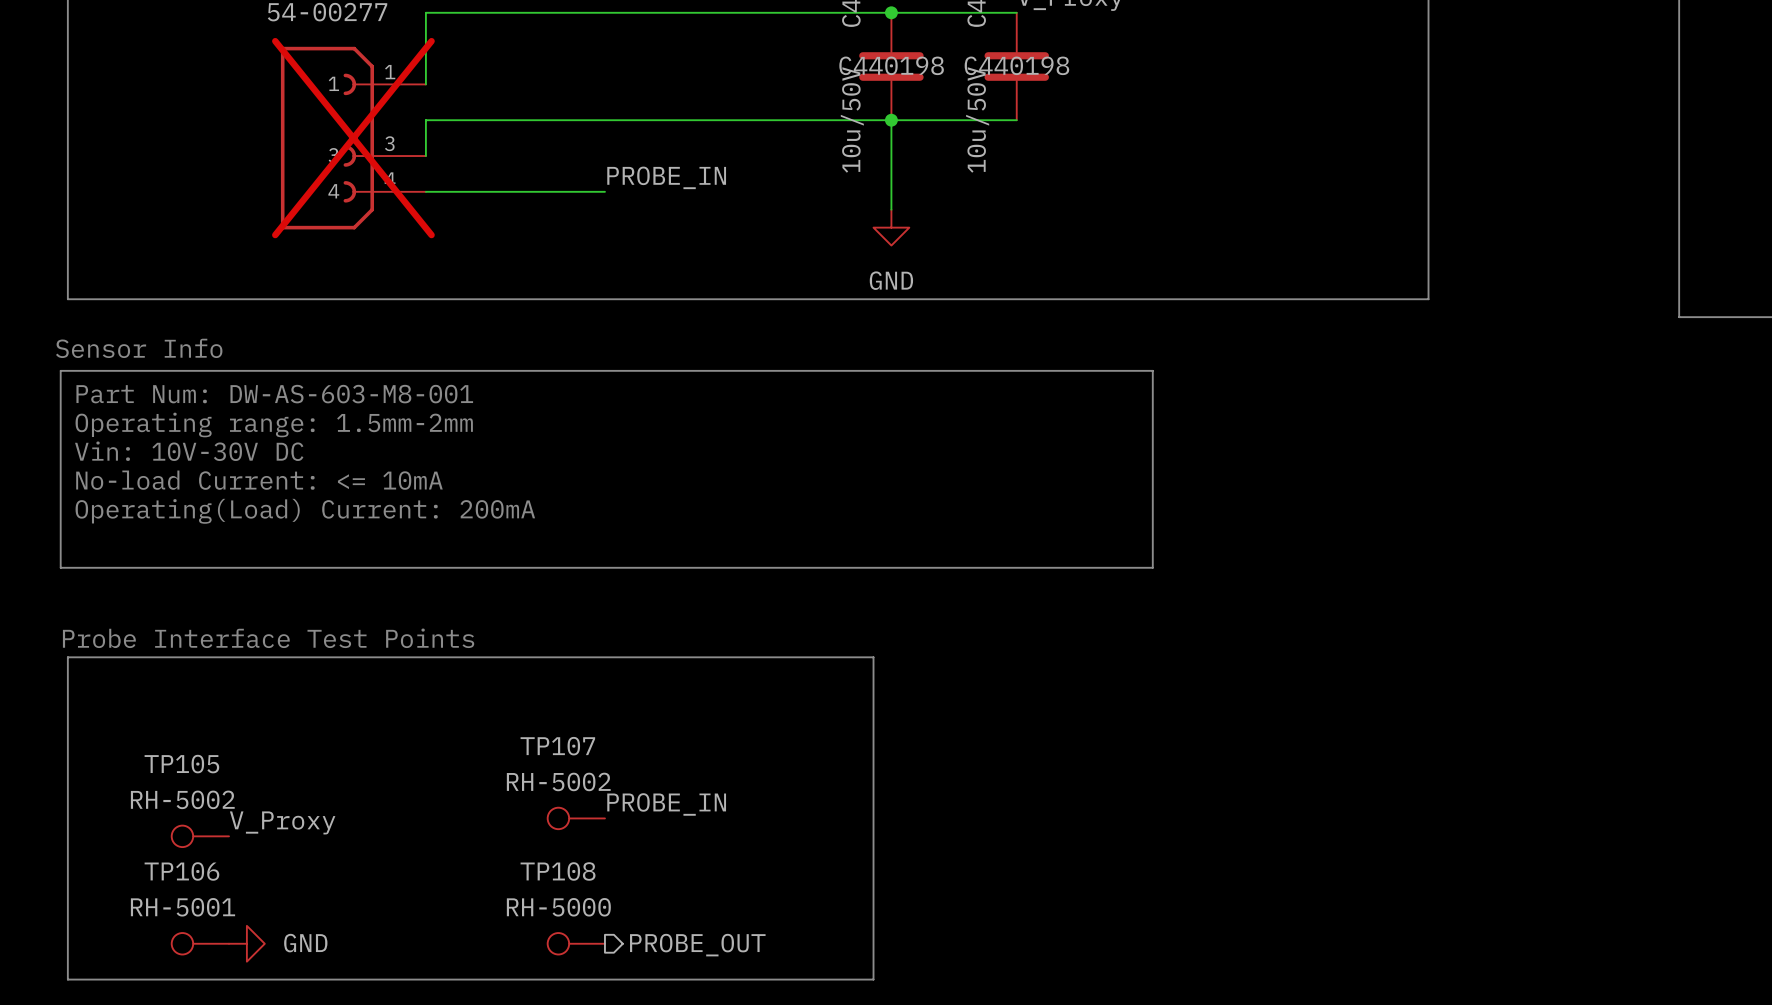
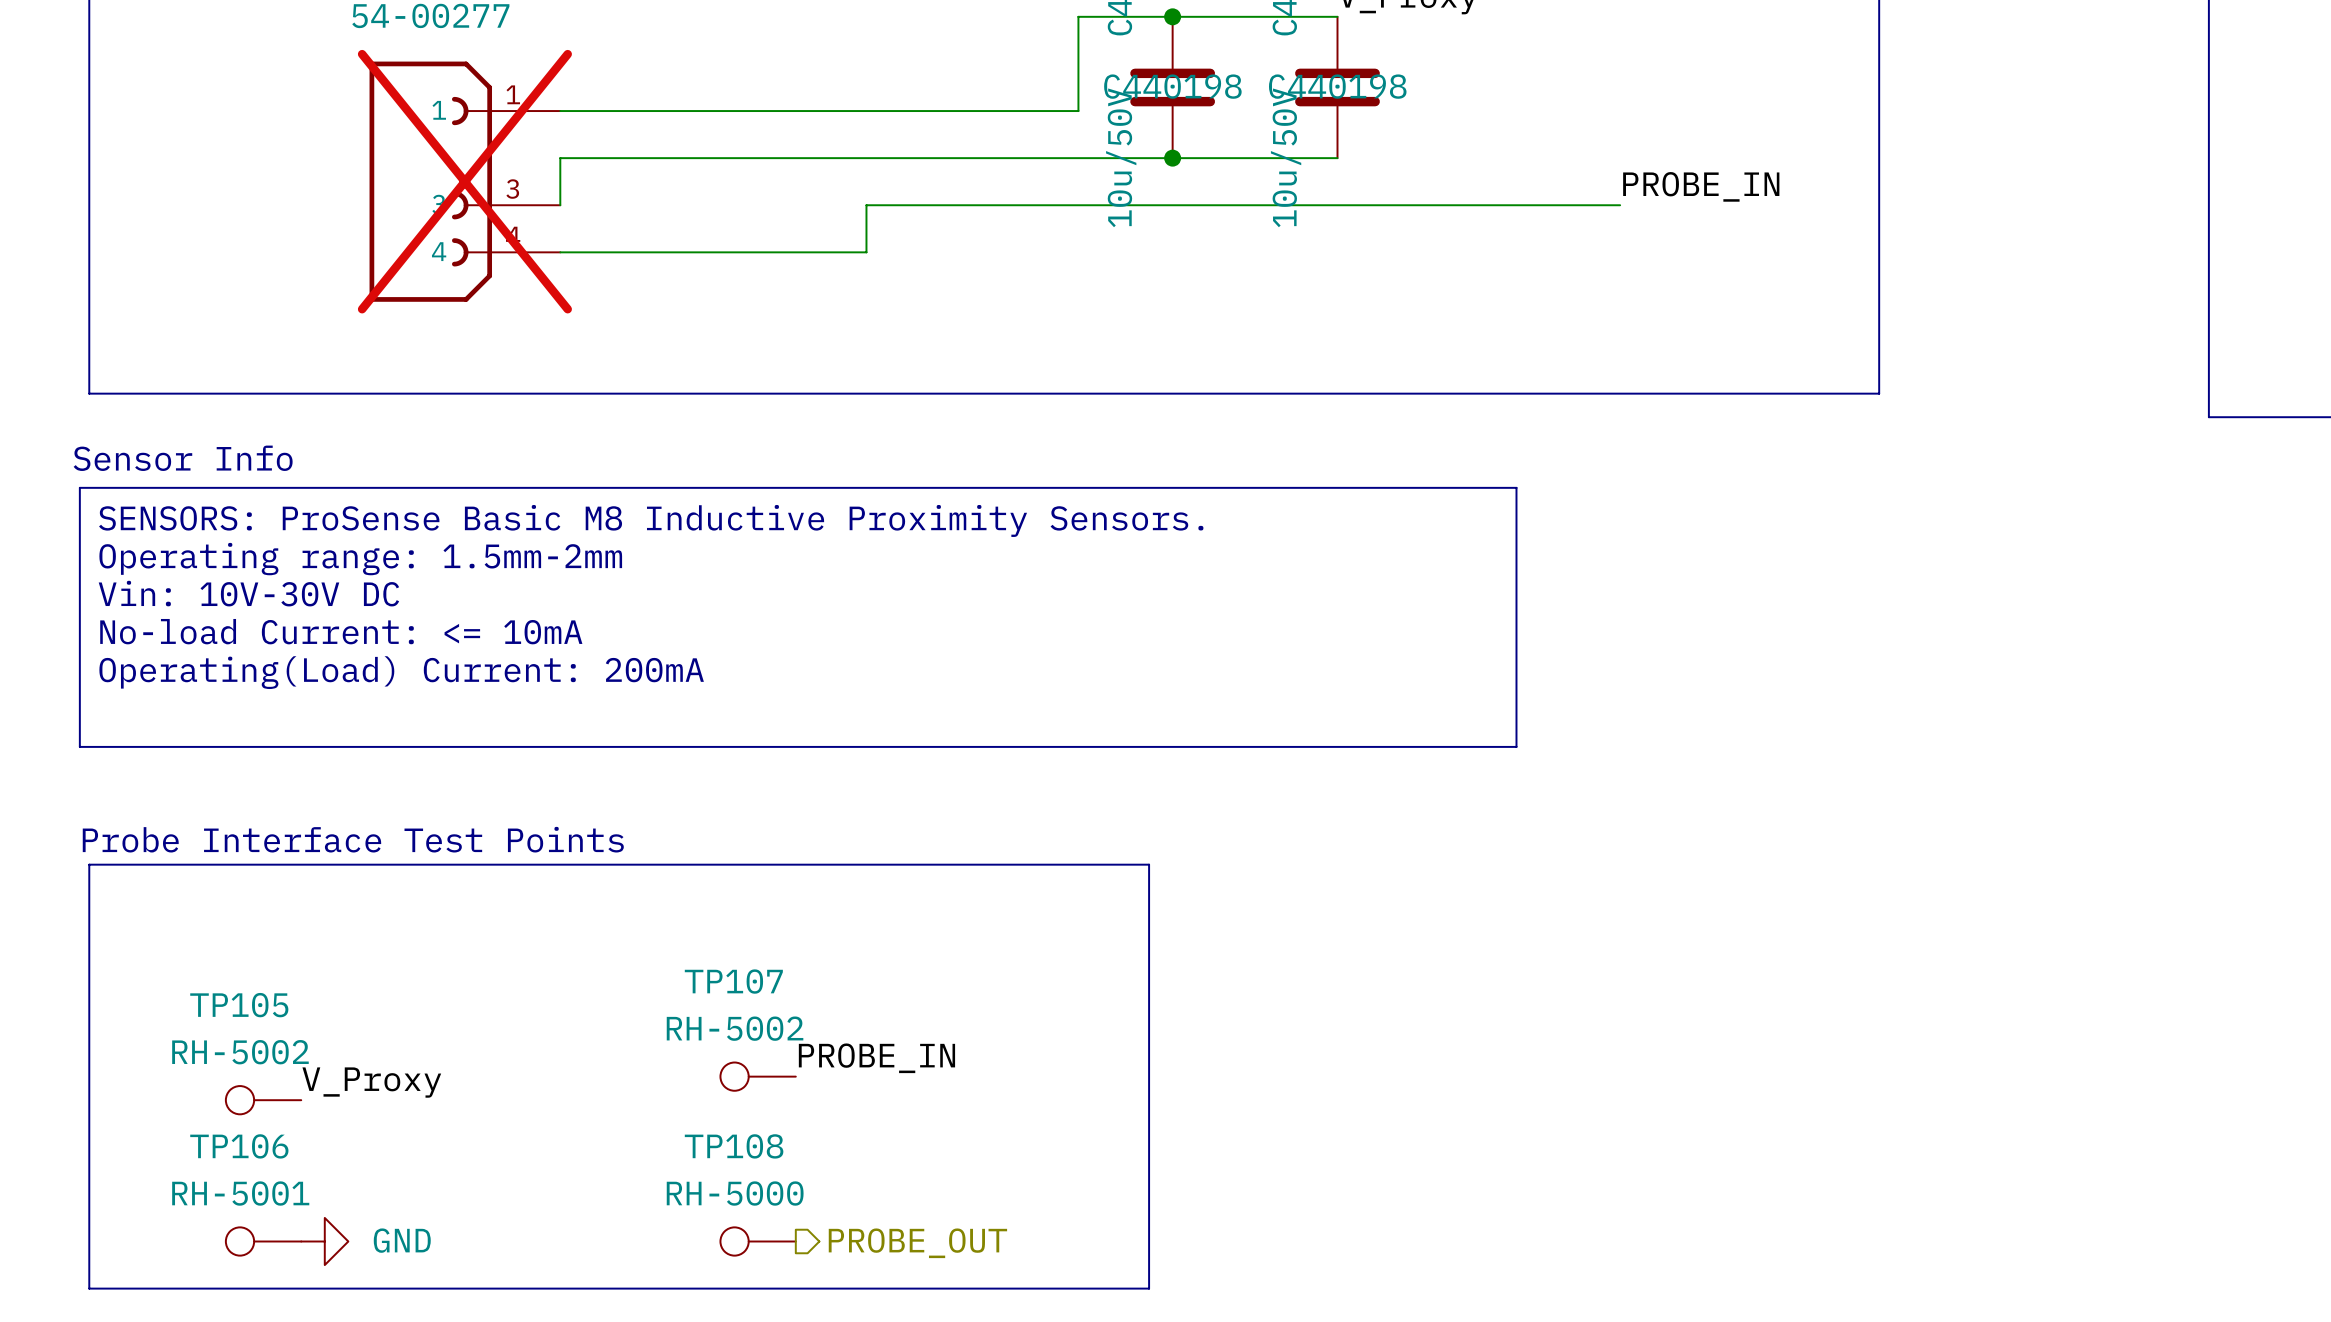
wire: (819, 12) (425, 12) (425, 84) -> (1078, 16) (1078, 111) (560, 111)
wire: (891, 120) (891, 209) -> none
label: none -> PROBE_IN (1701, 186)
wire: none -> (1620, 205) (866, 205) (866, 252) (795, 252)
label: PROBE_IN (666, 177) -> none
power symbol: GND (891, 227) -> none
text: Part Num: DW-AS-603-M8-001 (274, 394) -> SENSORS: ProSense Basic M8 Inductive Proximity Sensors. (651, 520)

